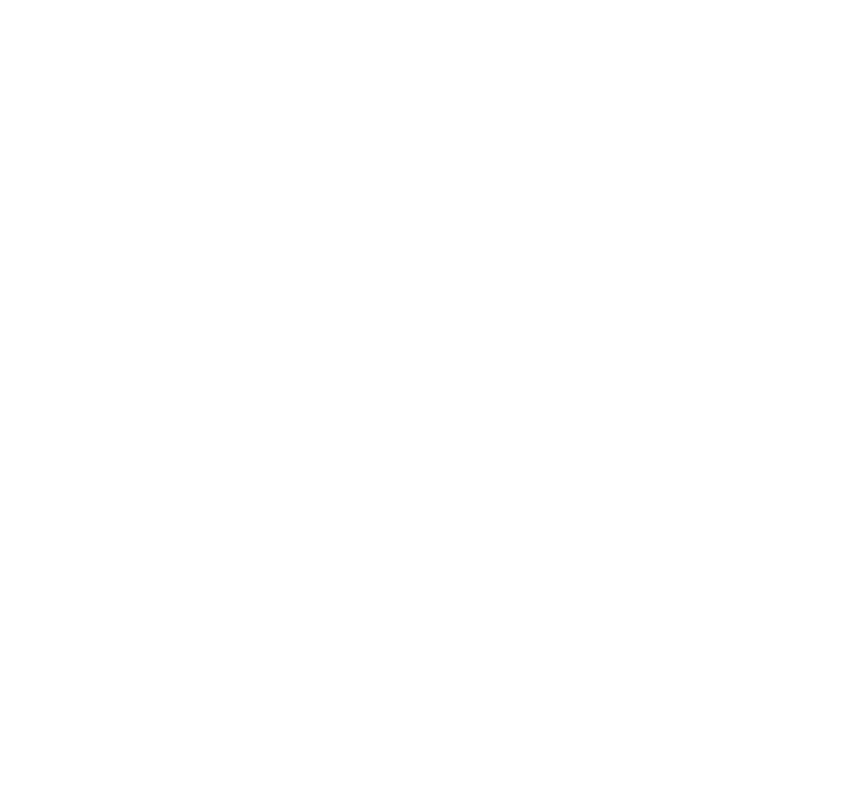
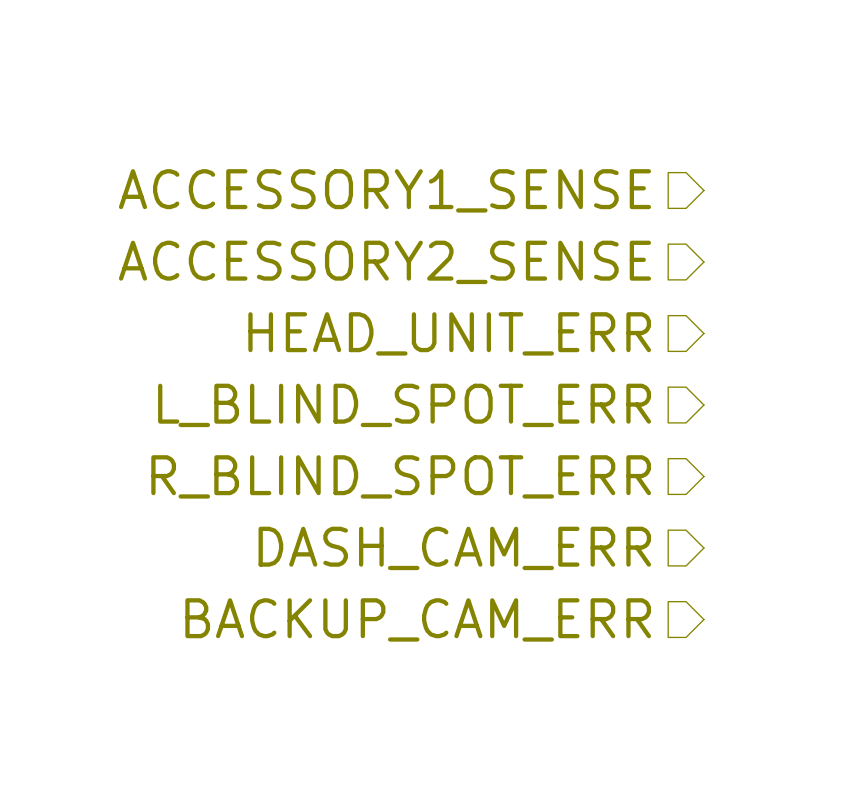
hierarchical label: none -> ACCESSORY1_SENSE (384, 190)
hierarchical label: none -> ACCESSORY2_SENSE (384, 262)
hierarchical label: none -> HEAD_UNIT_ERR (449, 333)
hierarchical label: none -> L_BLIND_SPOT_ERR (404, 405)
hierarchical label: none -> R_BLIND_SPOT_ERR (401, 476)
hierarchical label: none -> DASH_CAM_ERR (454, 548)
hierarchical label: none -> BACKUP_CAM_ERR (418, 619)

